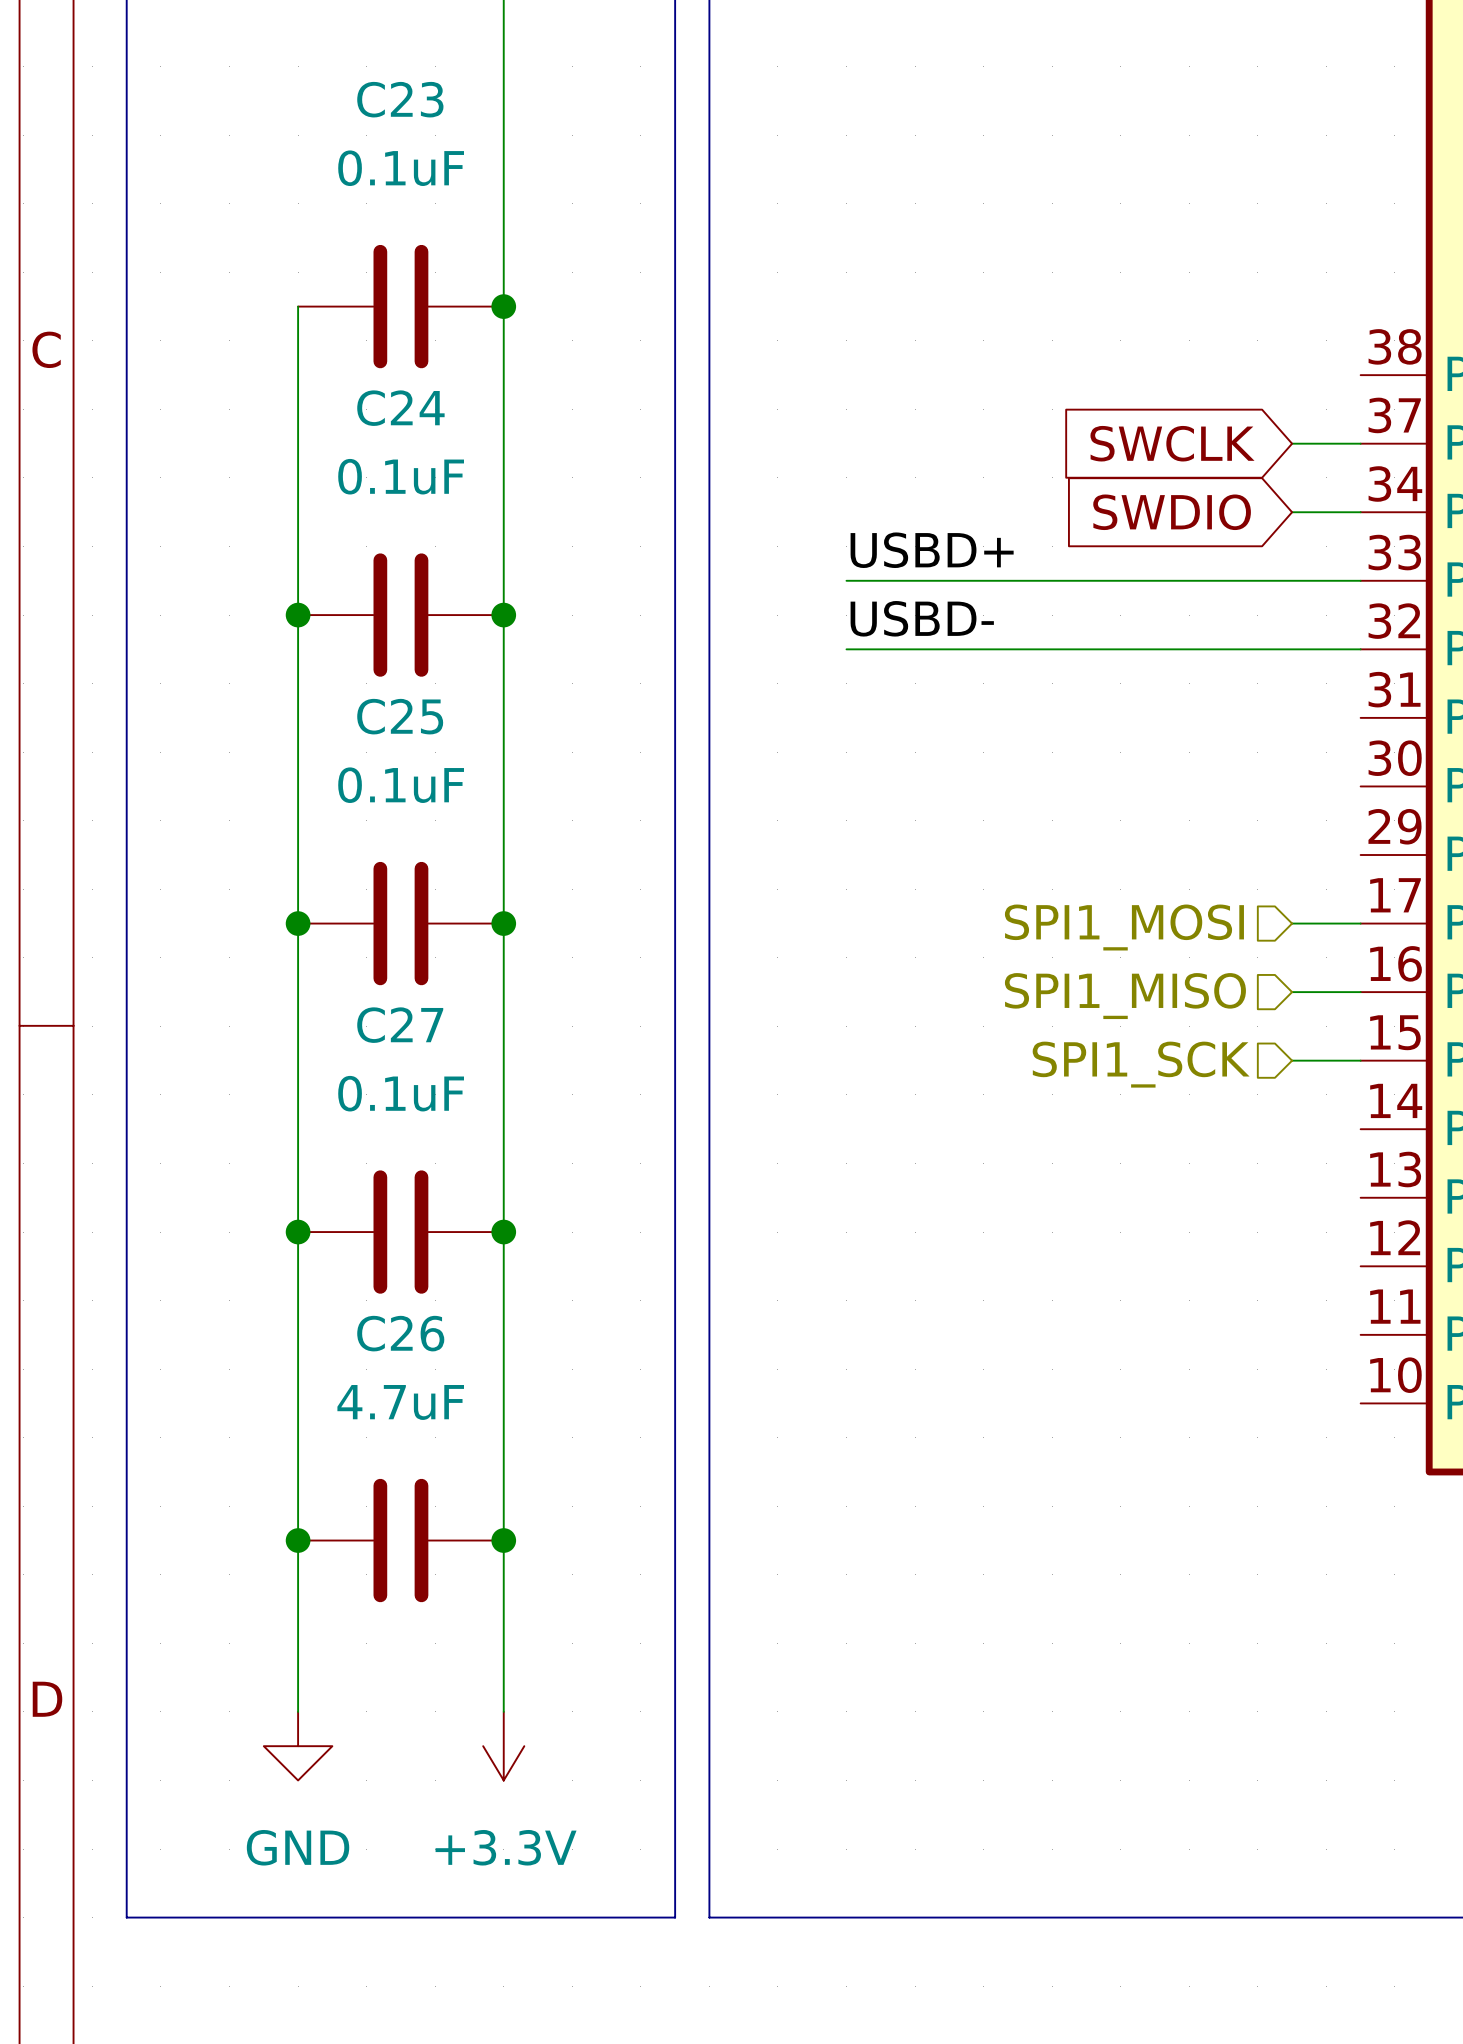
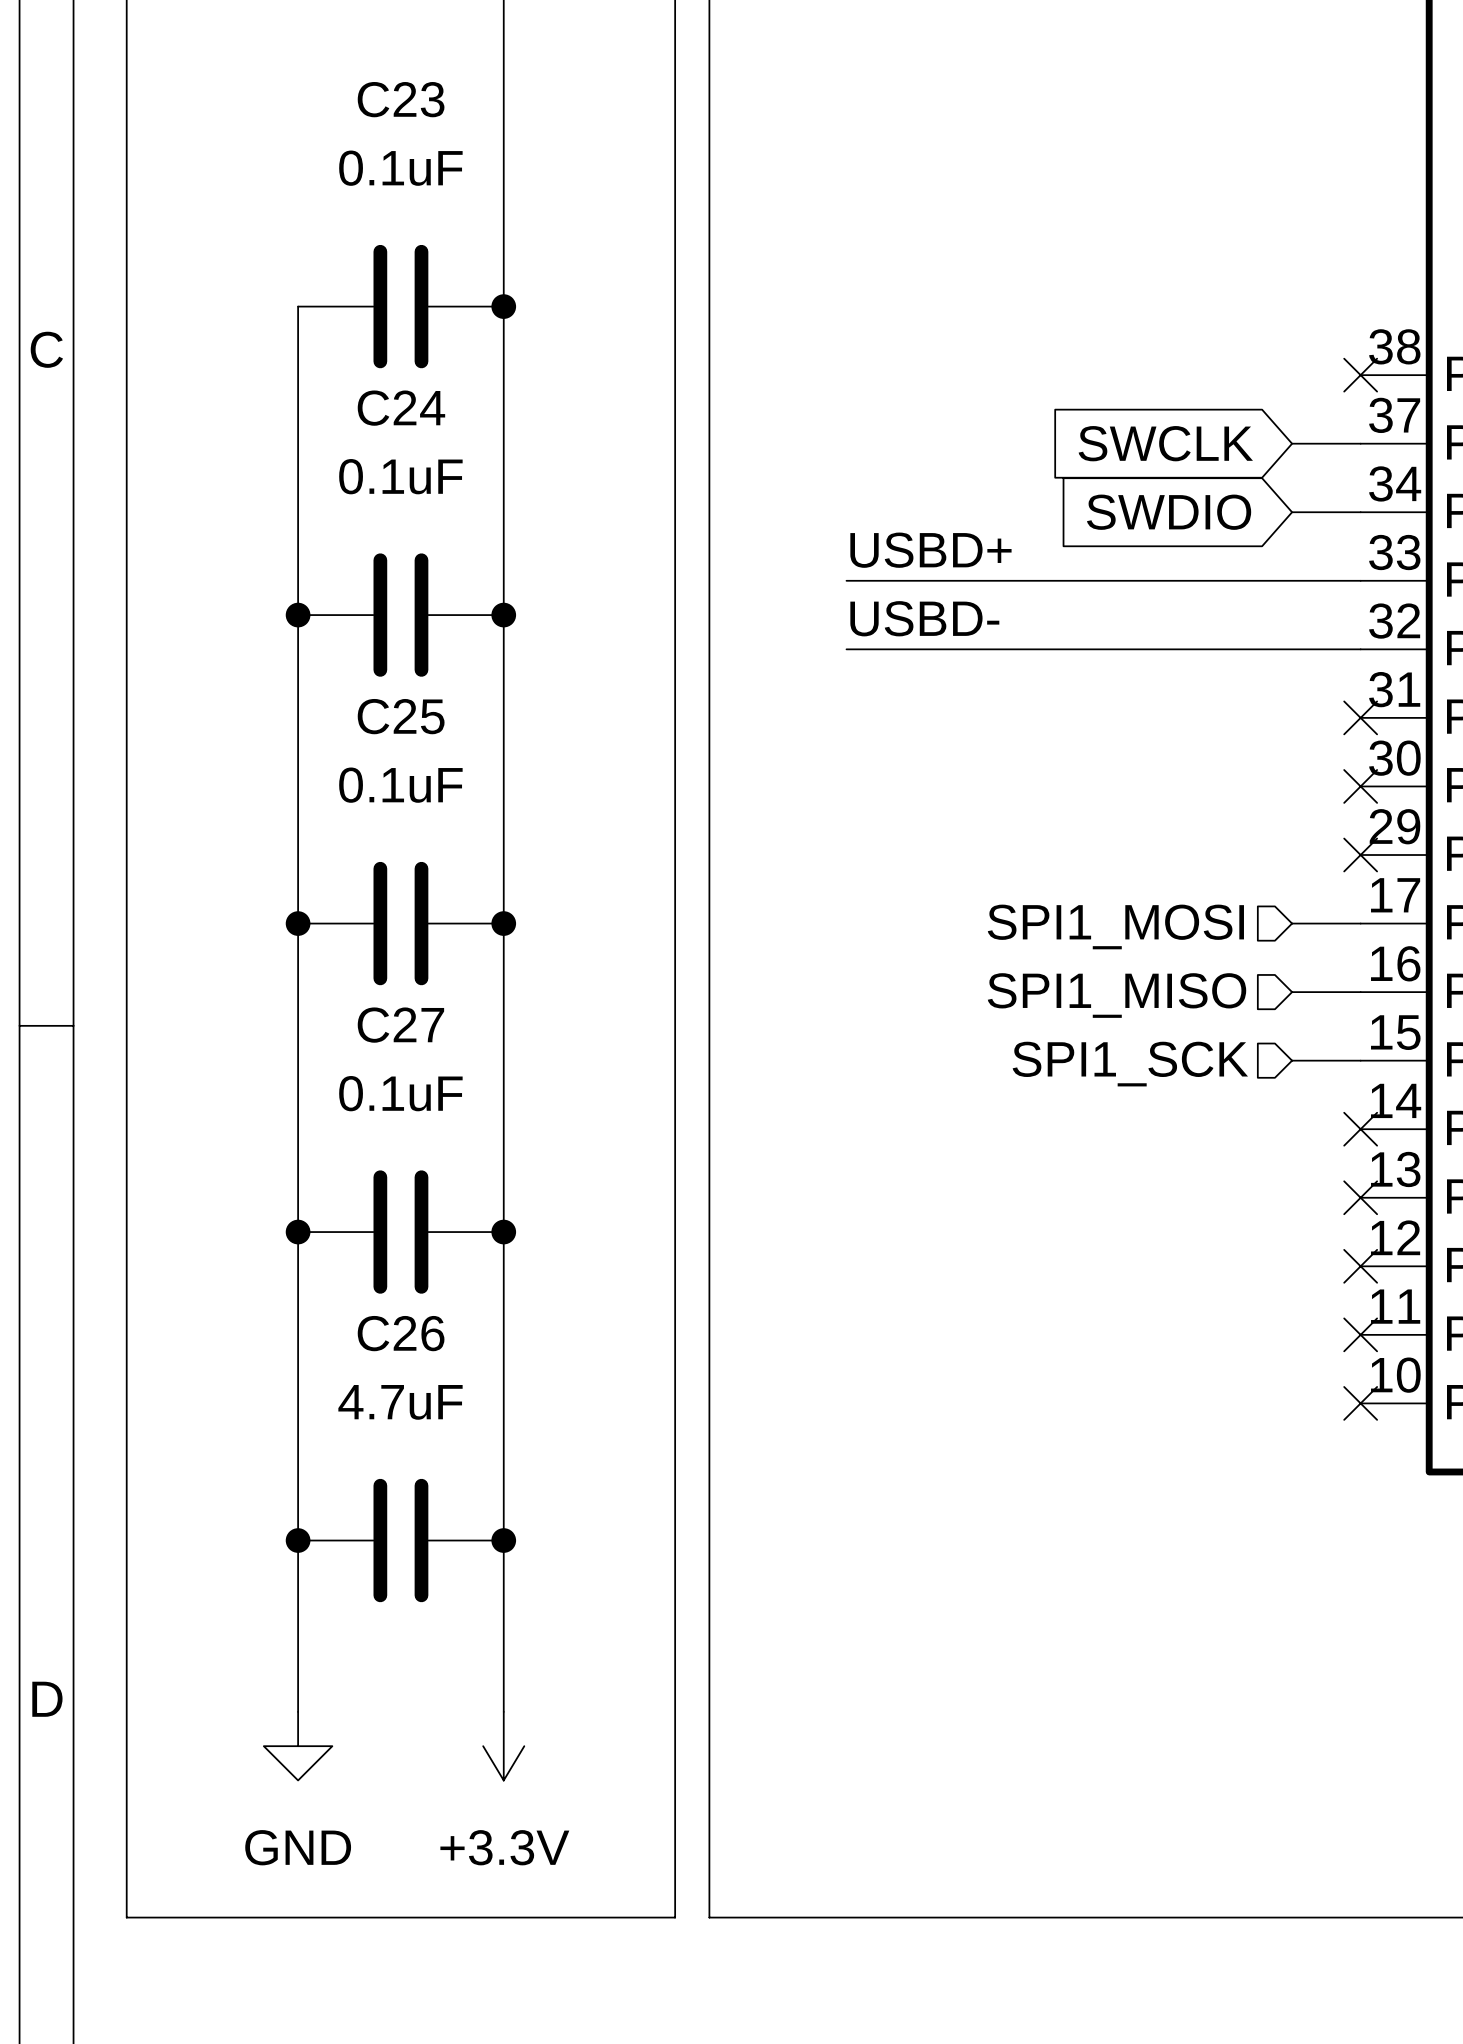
no-connect mark: none -> (1360, 375)
no-connect mark: none -> (1360, 717)
no-connect mark: none -> (1360, 786)
no-connect mark: none -> (1360, 855)
no-connect mark: none -> (1360, 1129)
no-connect mark: none -> (1360, 1197)
no-connect mark: none -> (1360, 1266)
no-connect mark: none -> (1360, 1334)
no-connect mark: none -> (1360, 1403)

